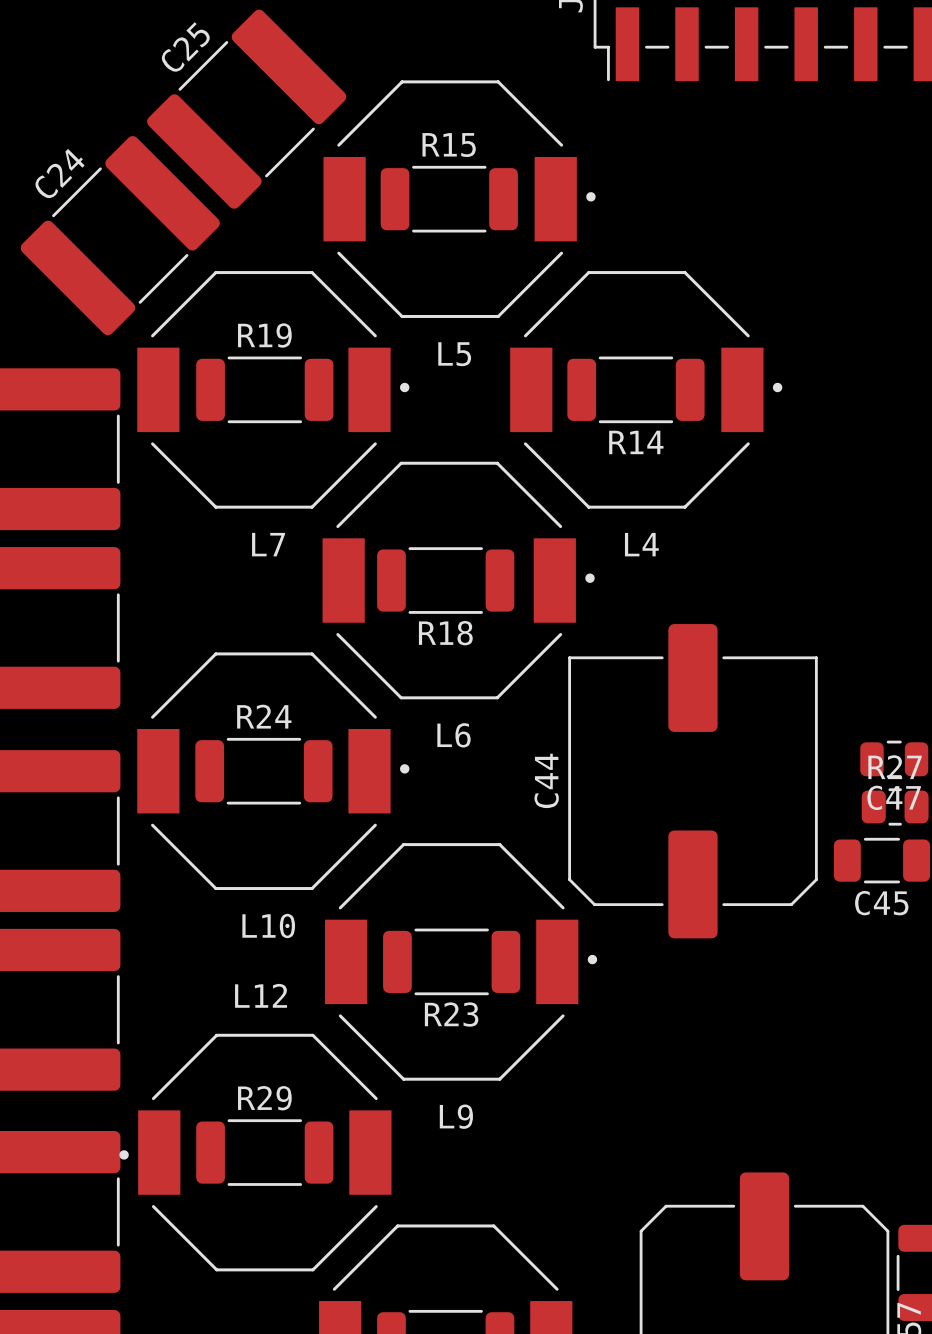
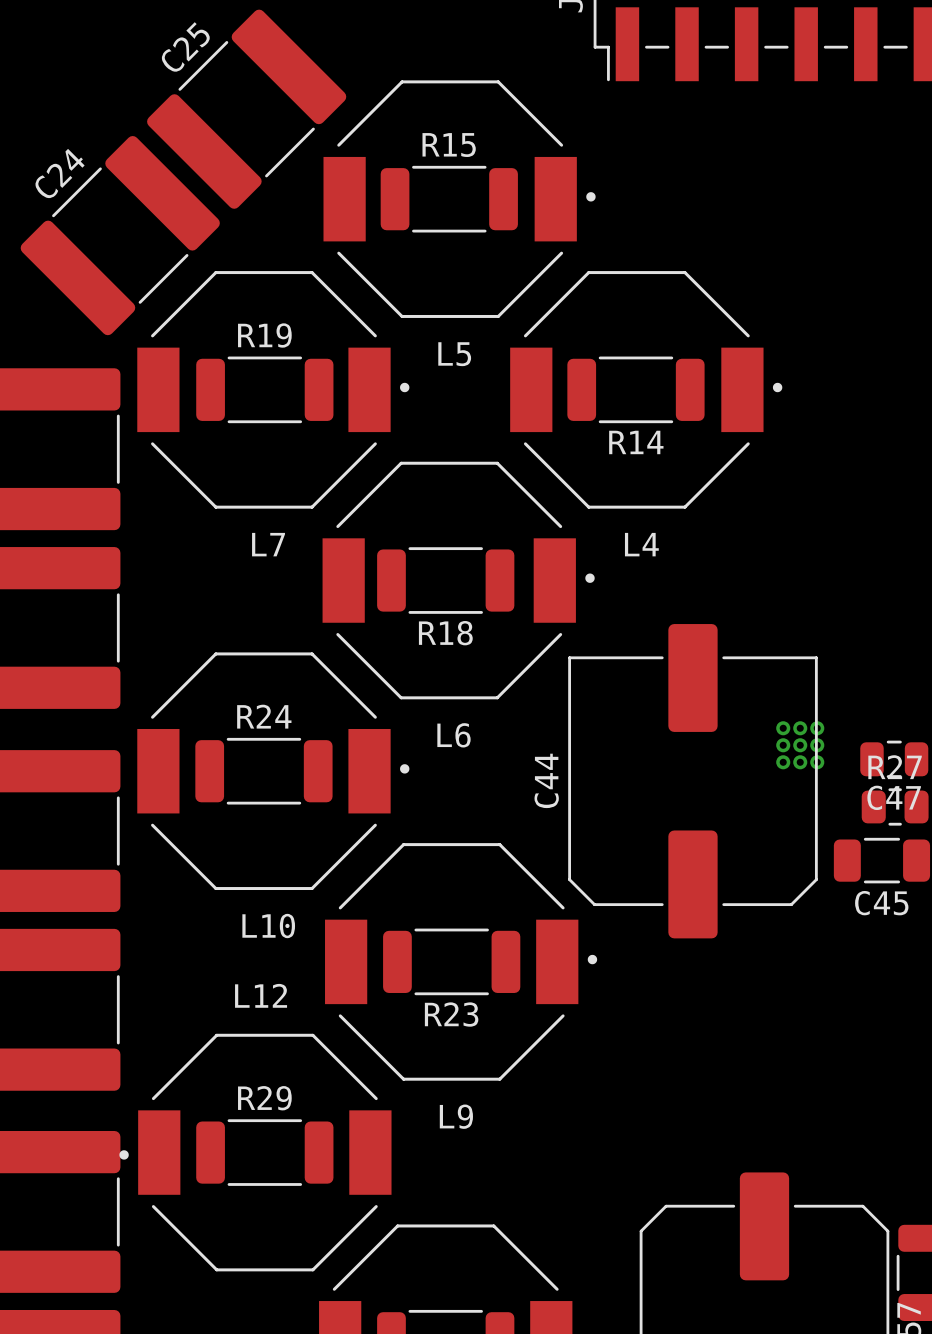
via: none -> (783, 728)
via: none -> (800, 728)
via: none -> (817, 728)
via: none -> (783, 745)
via: none -> (800, 745)
via: none -> (817, 745)
via: none -> (783, 762)
via: none -> (800, 762)
via: none -> (817, 762)

